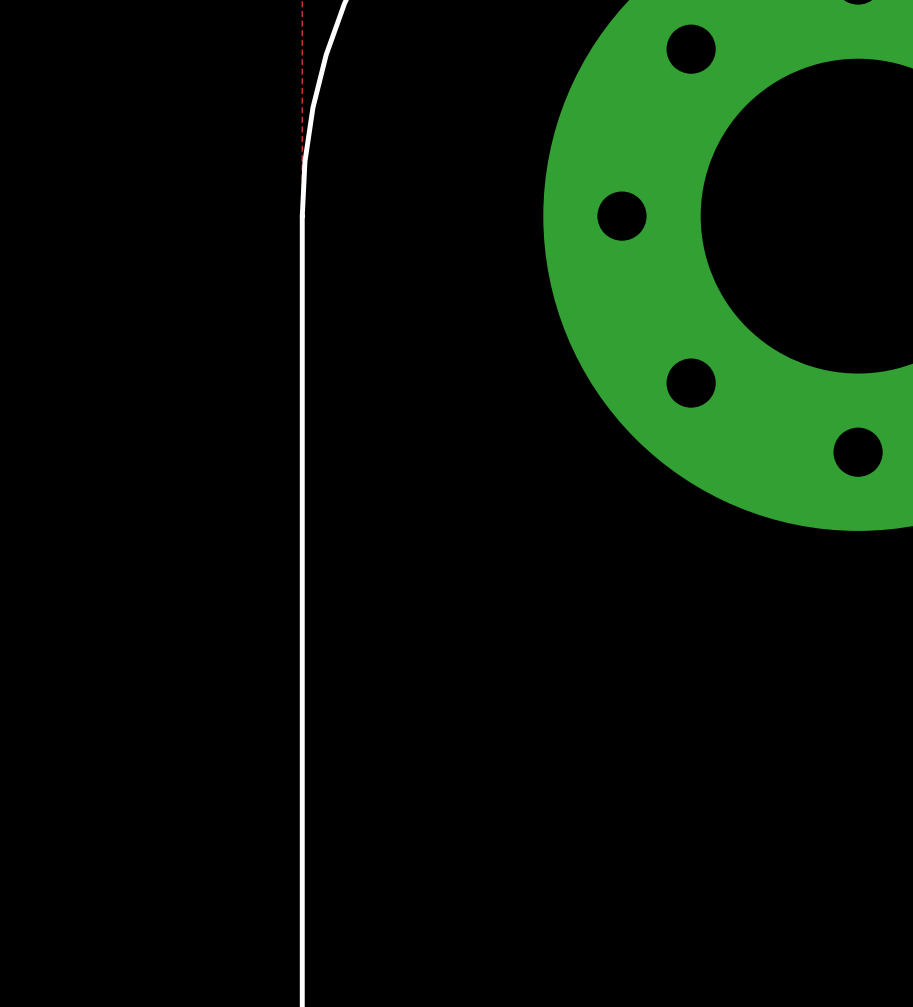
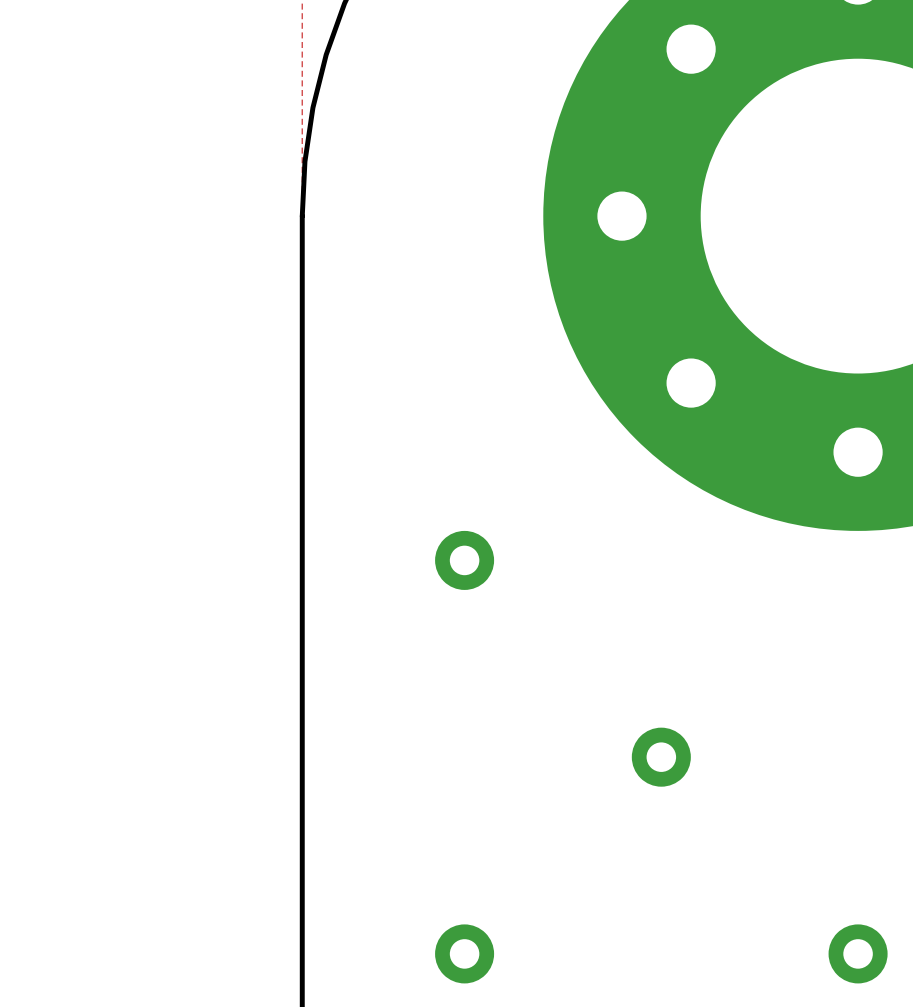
via: none -> (464, 560)
via: none -> (661, 757)
via: none -> (464, 953)
via: none -> (858, 953)

